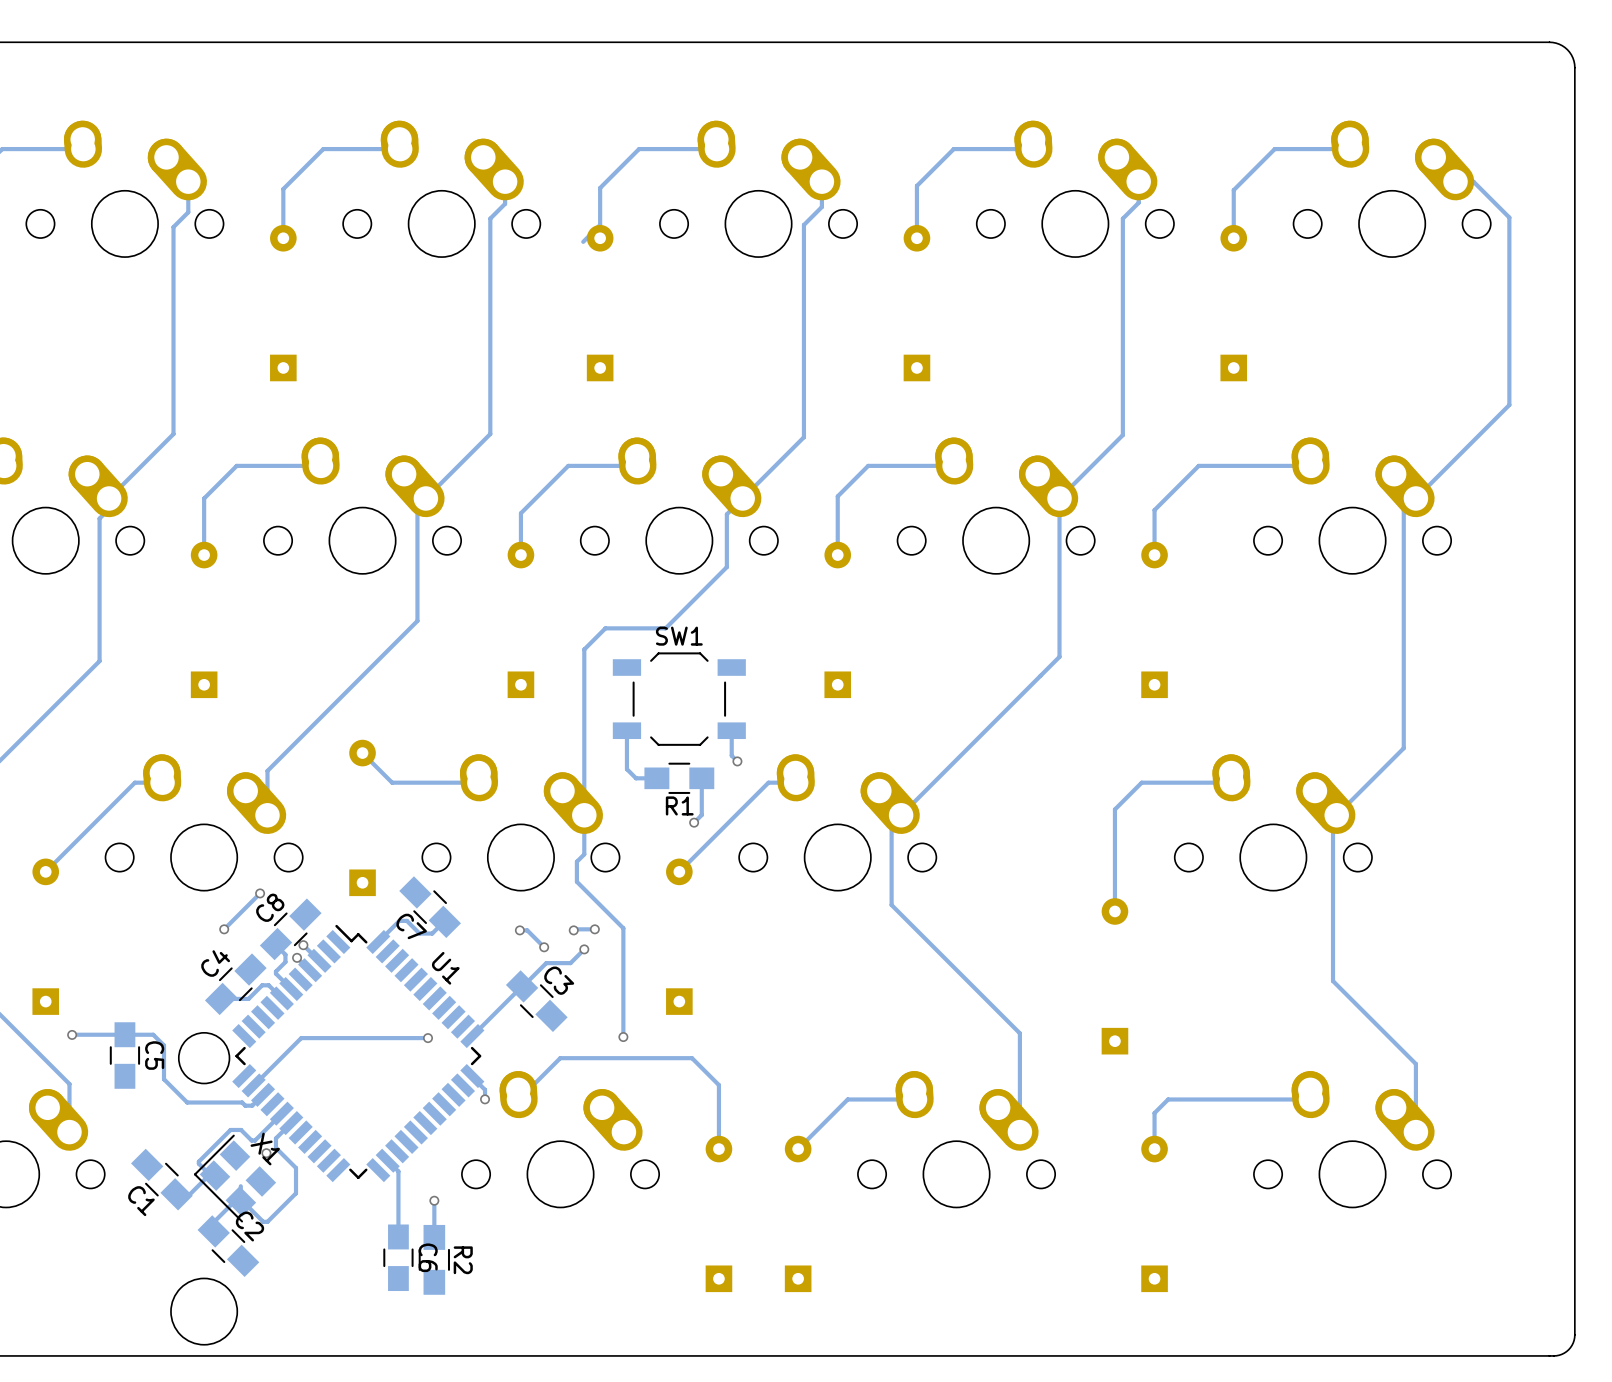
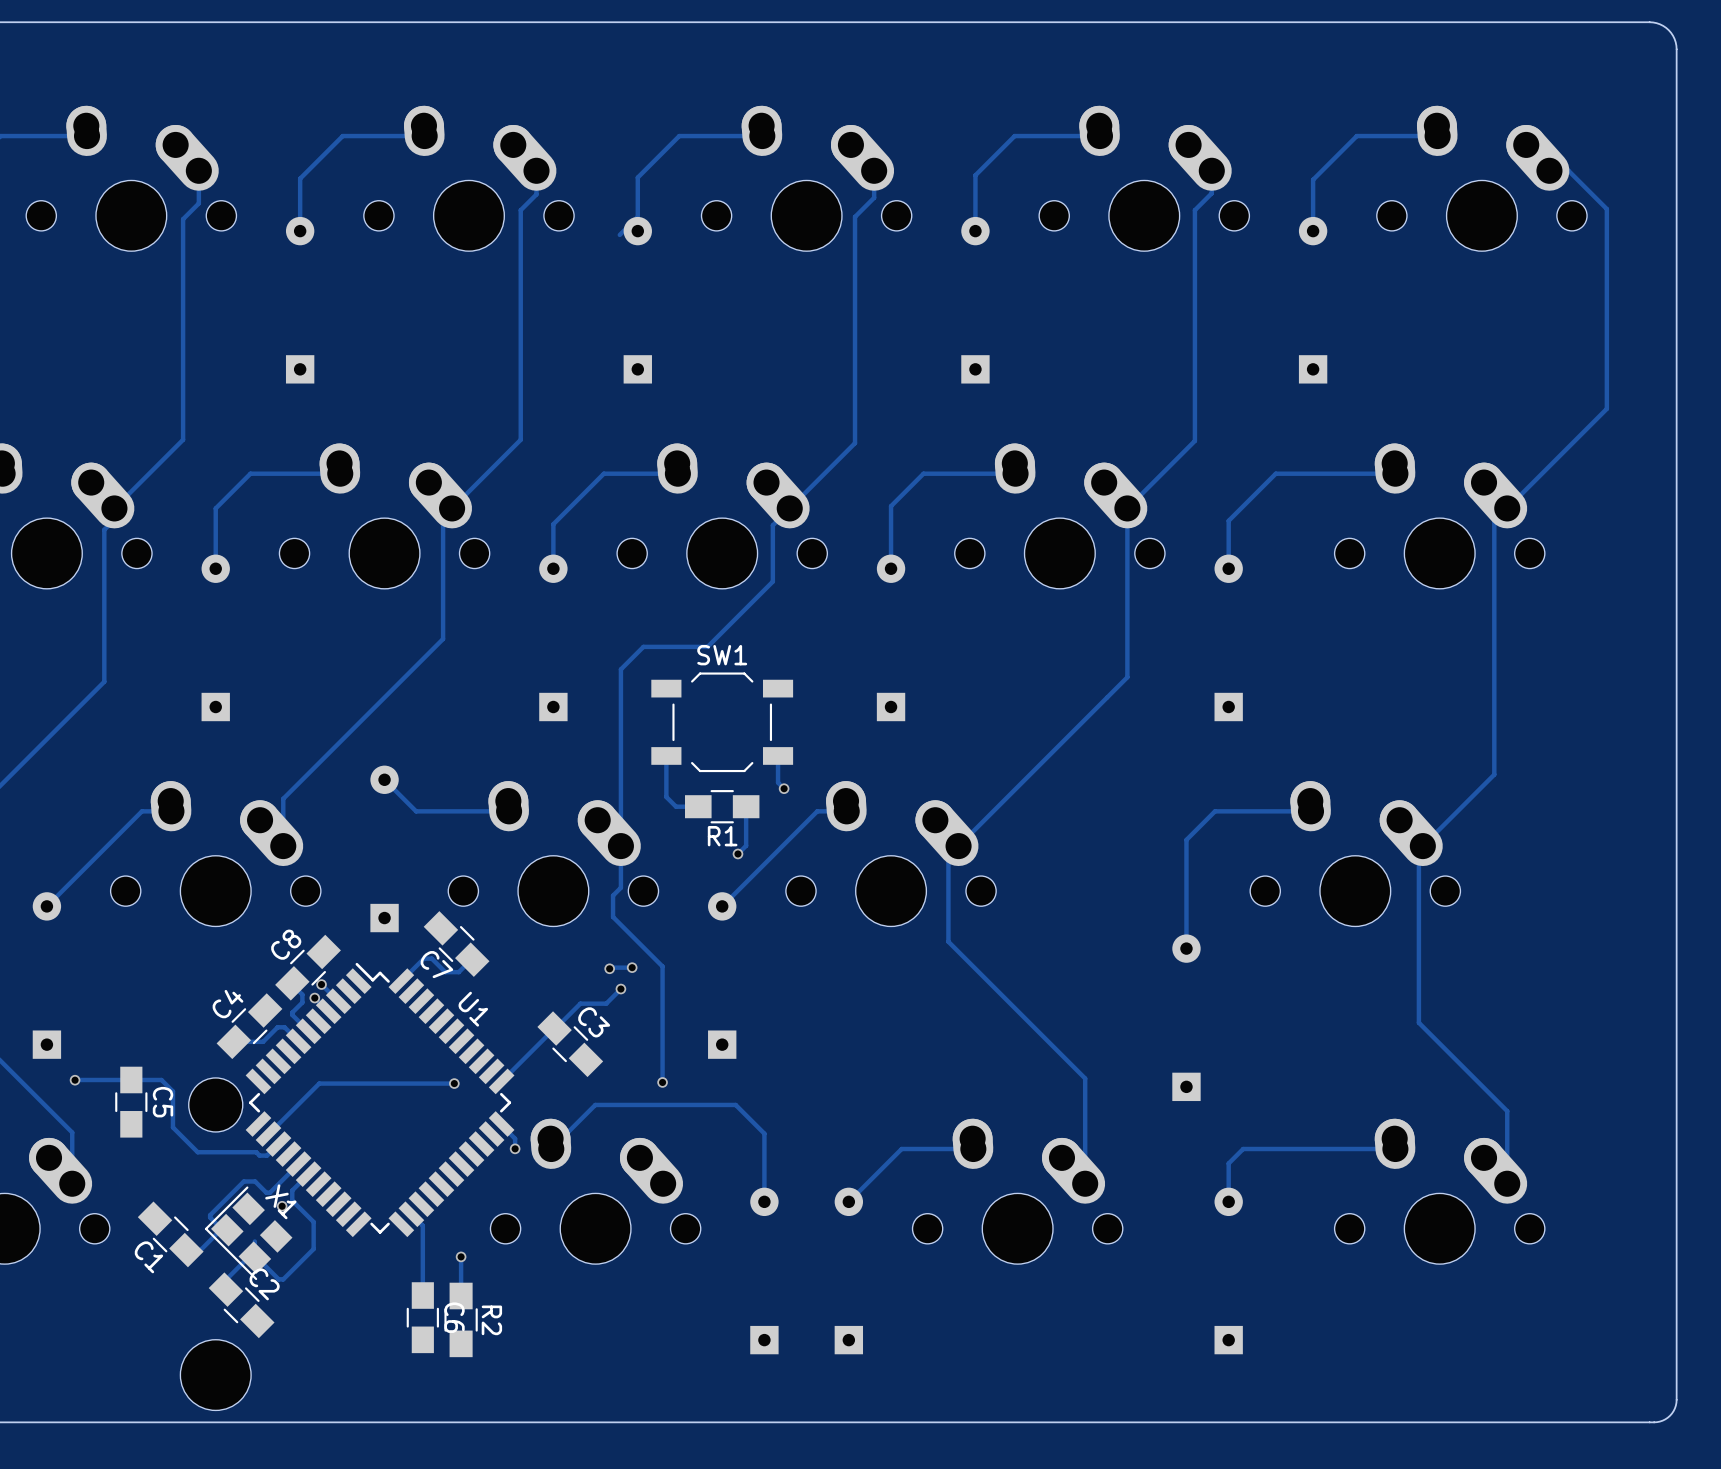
track: (260, 893) (224, 929) -> none
via: (260, 893) -> none
via: (224, 929) -> none
track: (519, 930) (527, 930) (544, 947) -> none
via: (519, 930) -> none
via: (544, 947) -> none

